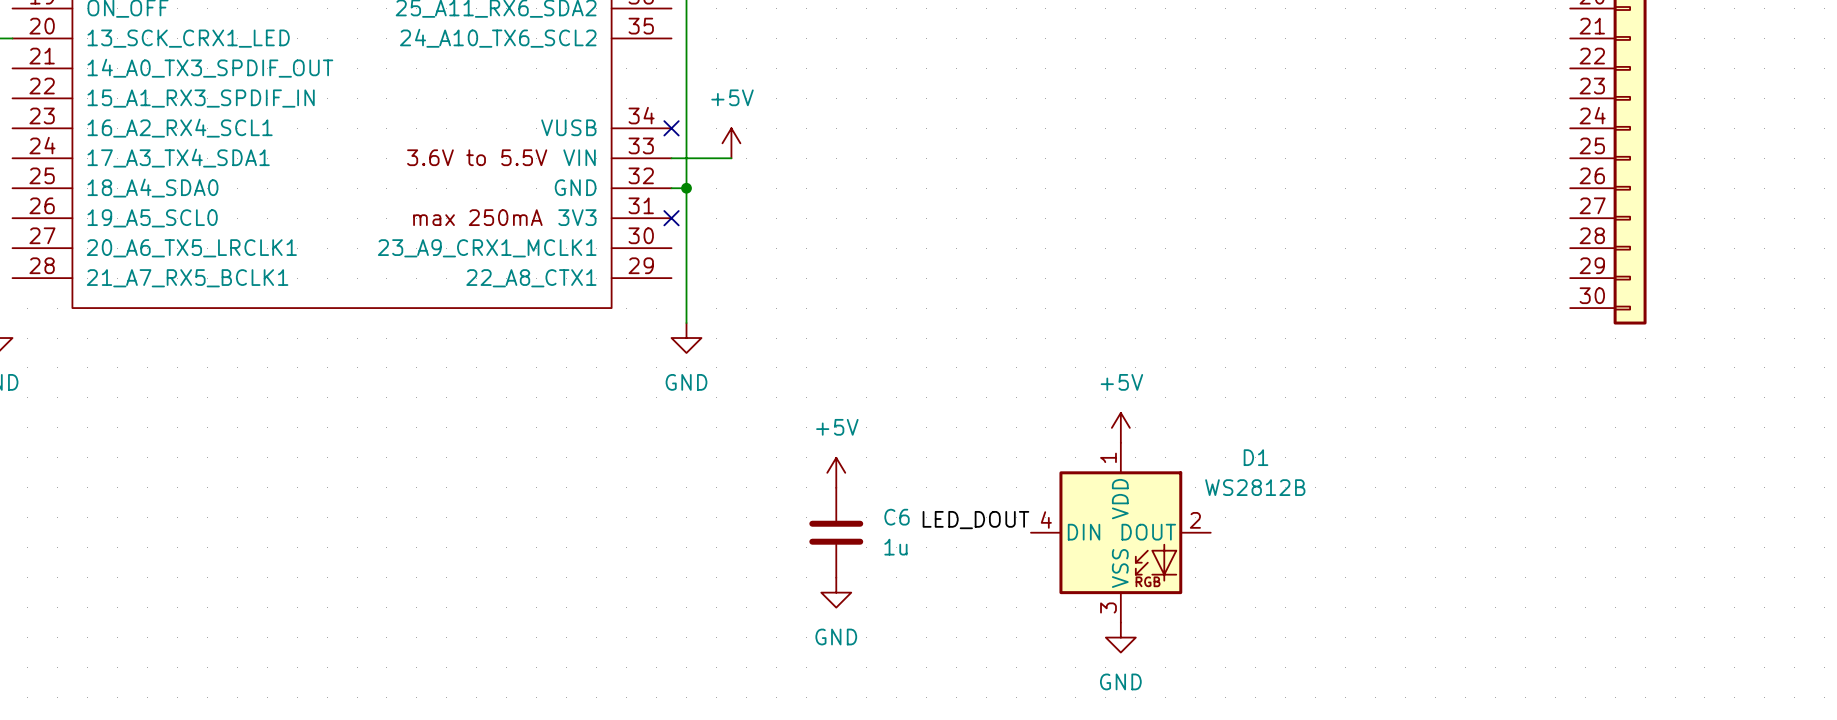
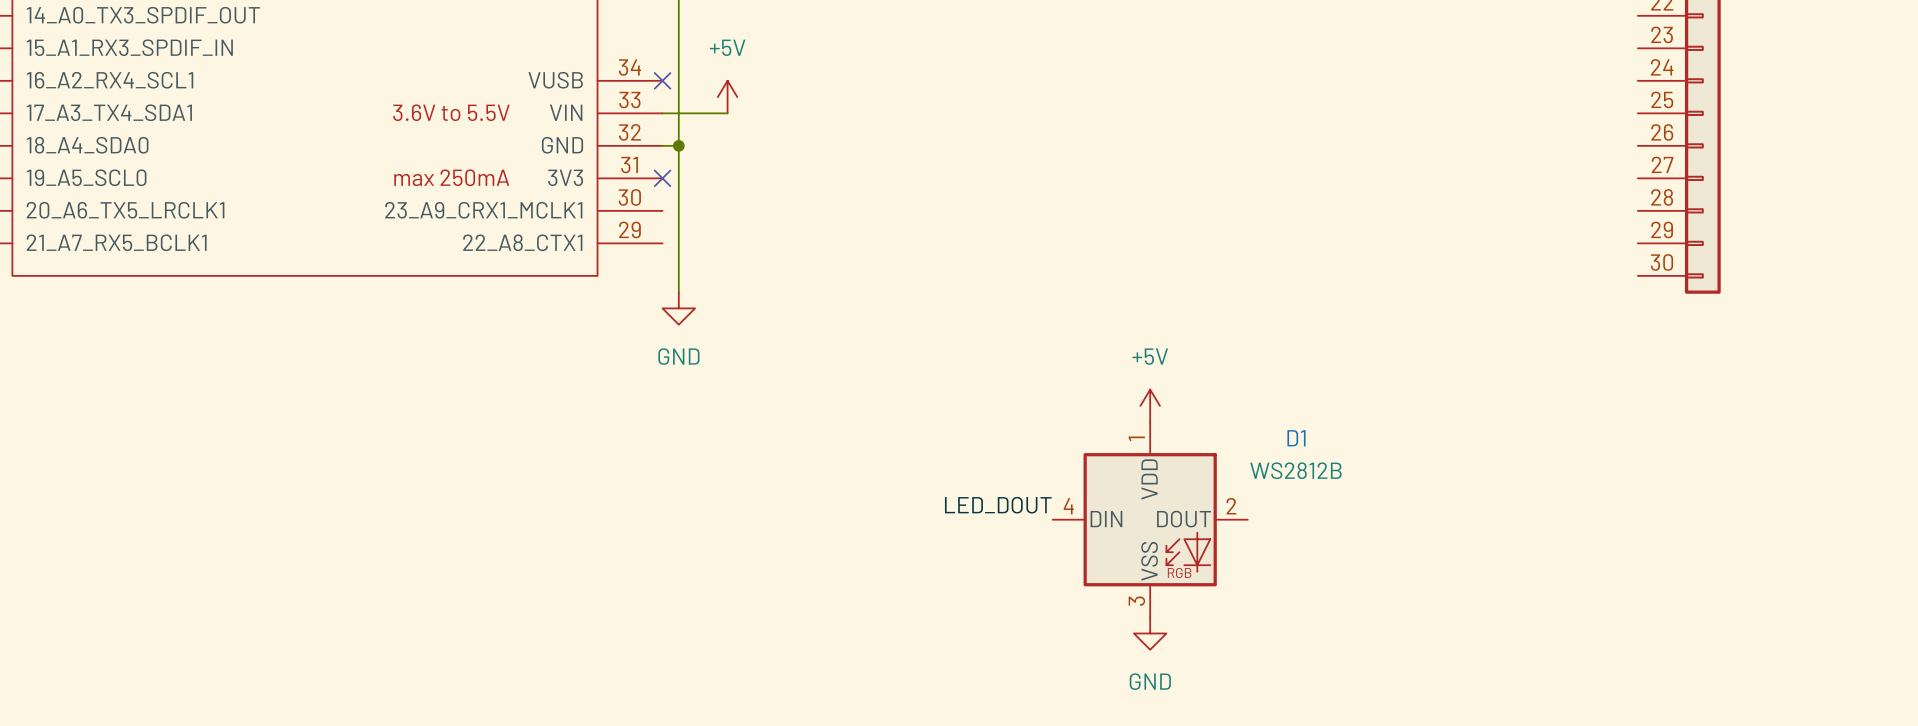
power symbol: +5V (836, 472) -> none
C6: 1u (836, 532) -> none
power symbol: GND (836, 592) -> none

